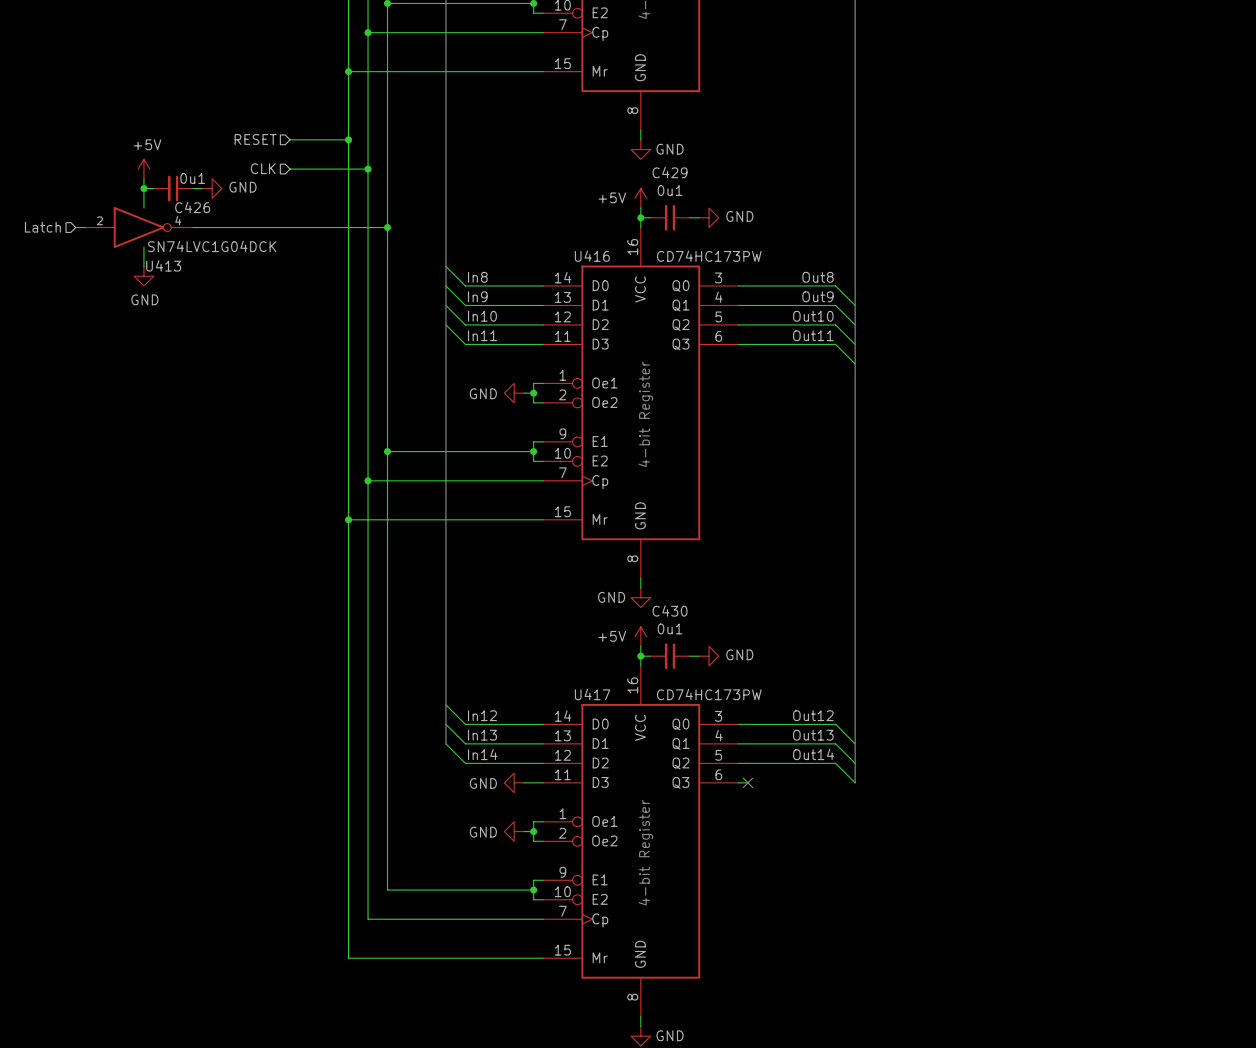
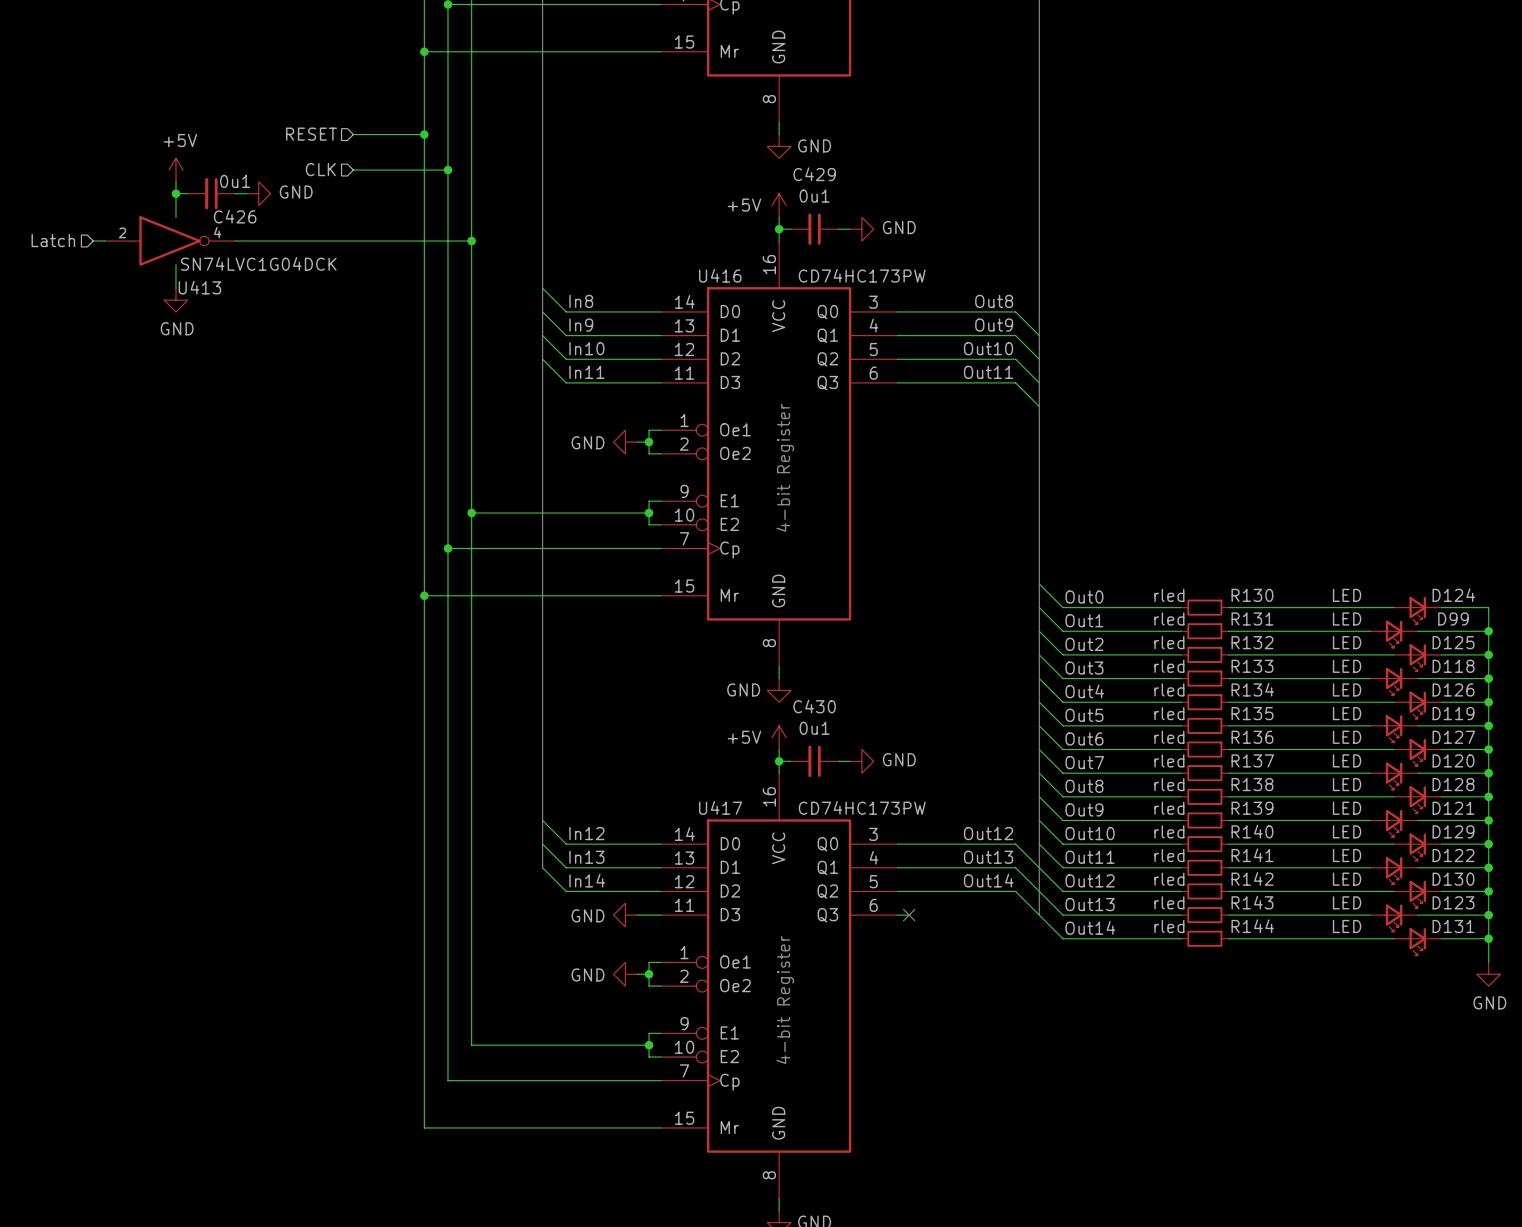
wire: none -> (1039, 583) (1062, 607) (1181, 607)
label: none -> Out0 (1084, 597)
wire: none -> (1039, 607) (1062, 631) (1181, 631)
R130: none -> rled (1204, 607)
wire: none -> (1228, 607) (1394, 607)
wire: none -> (1441, 607) (1488, 607) (1488, 962)
D124: none -> LED (1417, 610)
label: none -> Out1 (1084, 620)
wire: none -> (1039, 631) (1062, 654) (1181, 654)
R131: none -> rled (1204, 631)
wire: none -> (1228, 631) (1370, 631)
wire: none -> (1417, 631) (1488, 631)
junction: none -> (1488, 631)
D99: none -> LED (1394, 634)
label: none -> Out2 (1084, 644)
wire: none -> (1039, 654) (1062, 678) (1181, 678)
R132: none -> rled (1204, 654)
wire: none -> (1228, 654) (1394, 654)
wire: none -> (1441, 654) (1488, 654)
junction: none -> (1488, 654)
D125: none -> LED (1417, 657)
label: none -> Out3 (1084, 668)
wire: none -> (1039, 678) (1062, 702) (1181, 702)
R133: none -> rled (1204, 678)
wire: none -> (1228, 678) (1370, 678)
wire: none -> (1417, 678) (1488, 678)
junction: none -> (1488, 678)
D118: none -> LED (1394, 681)
label: none -> Out4 (1084, 691)
wire: none -> (1039, 702) (1062, 725) (1181, 725)
R134: none -> rled (1204, 702)
wire: none -> (1228, 702) (1394, 702)
wire: none -> (1441, 702) (1488, 702)
junction: none -> (1488, 702)
D126: none -> LED (1417, 705)
label: none -> Out5 (1084, 715)
wire: none -> (1039, 725) (1062, 749) (1181, 749)
R135: none -> rled (1204, 725)
wire: none -> (1228, 725) (1370, 725)
wire: none -> (1417, 725) (1488, 725)
junction: none -> (1488, 725)
D119: none -> LED (1394, 728)
label: none -> Out6 (1084, 738)
wire: none -> (1039, 749) (1062, 773) (1181, 773)
R136: none -> rled (1204, 749)
wire: none -> (1228, 749) (1394, 749)
wire: none -> (1441, 749) (1488, 749)
junction: none -> (1488, 749)
D127: none -> LED (1417, 752)
label: none -> Out7 (1084, 762)
wire: none -> (1039, 773) (1062, 796) (1181, 796)
R137: none -> rled (1204, 773)
wire: none -> (1228, 773) (1370, 773)
wire: none -> (1417, 773) (1488, 773)
junction: none -> (1488, 773)
D120: none -> LED (1394, 776)
label: none -> Out8 (1084, 786)
wire: none -> (1039, 796) (1062, 820) (1181, 820)
R138: none -> rled (1204, 796)
wire: none -> (1228, 796) (1394, 796)
wire: none -> (1441, 796) (1488, 796)
junction: none -> (1488, 796)
D128: none -> LED (1417, 799)
label: none -> Out9 (1084, 809)
wire: none -> (1039, 820) (1062, 844) (1181, 844)
R139: none -> rled (1204, 820)
wire: none -> (1228, 820) (1370, 820)
wire: none -> (1417, 820) (1488, 820)
junction: none -> (1488, 820)
D121: none -> LED (1394, 823)
label: none -> Out10 (1090, 833)
wire: none -> (1039, 844) (1062, 867) (1181, 867)
R140: none -> rled (1204, 844)
wire: none -> (1228, 844) (1394, 844)
wire: none -> (1441, 844) (1488, 844)
junction: none -> (1488, 844)
D129: none -> LED (1417, 847)
label: none -> Out11 (1090, 857)
wire: none -> (1039, 867) (1062, 891) (1181, 891)
R141: none -> rled (1204, 867)
wire: none -> (1228, 867) (1370, 867)
wire: none -> (1417, 867) (1488, 867)
junction: none -> (1488, 867)
D122: none -> LED (1394, 870)
label: none -> Out12 (1090, 880)
wire: none -> (1039, 891) (1062, 915) (1181, 915)
R142: none -> rled (1204, 891)
wire: none -> (1228, 891) (1394, 891)
wire: none -> (1441, 891) (1488, 891)
junction: none -> (1488, 891)
D130: none -> LED (1417, 894)
label: none -> Out13 (1090, 904)
wire: none -> (1039, 915) (1062, 938) (1181, 938)
R143: none -> rled (1204, 915)
wire: none -> (1228, 915) (1370, 915)
wire: none -> (1417, 915) (1488, 915)
junction: none -> (1488, 915)
D123: none -> LED (1394, 918)
label: none -> Out14 (1090, 927)
R144: none -> rled (1204, 938)
wire: none -> (1228, 938) (1394, 938)
wire: none -> (1441, 938) (1488, 938)
junction: none -> (1488, 938)
D131: none -> LED (1417, 941)
power symbol: none -> GND (1488, 974)

